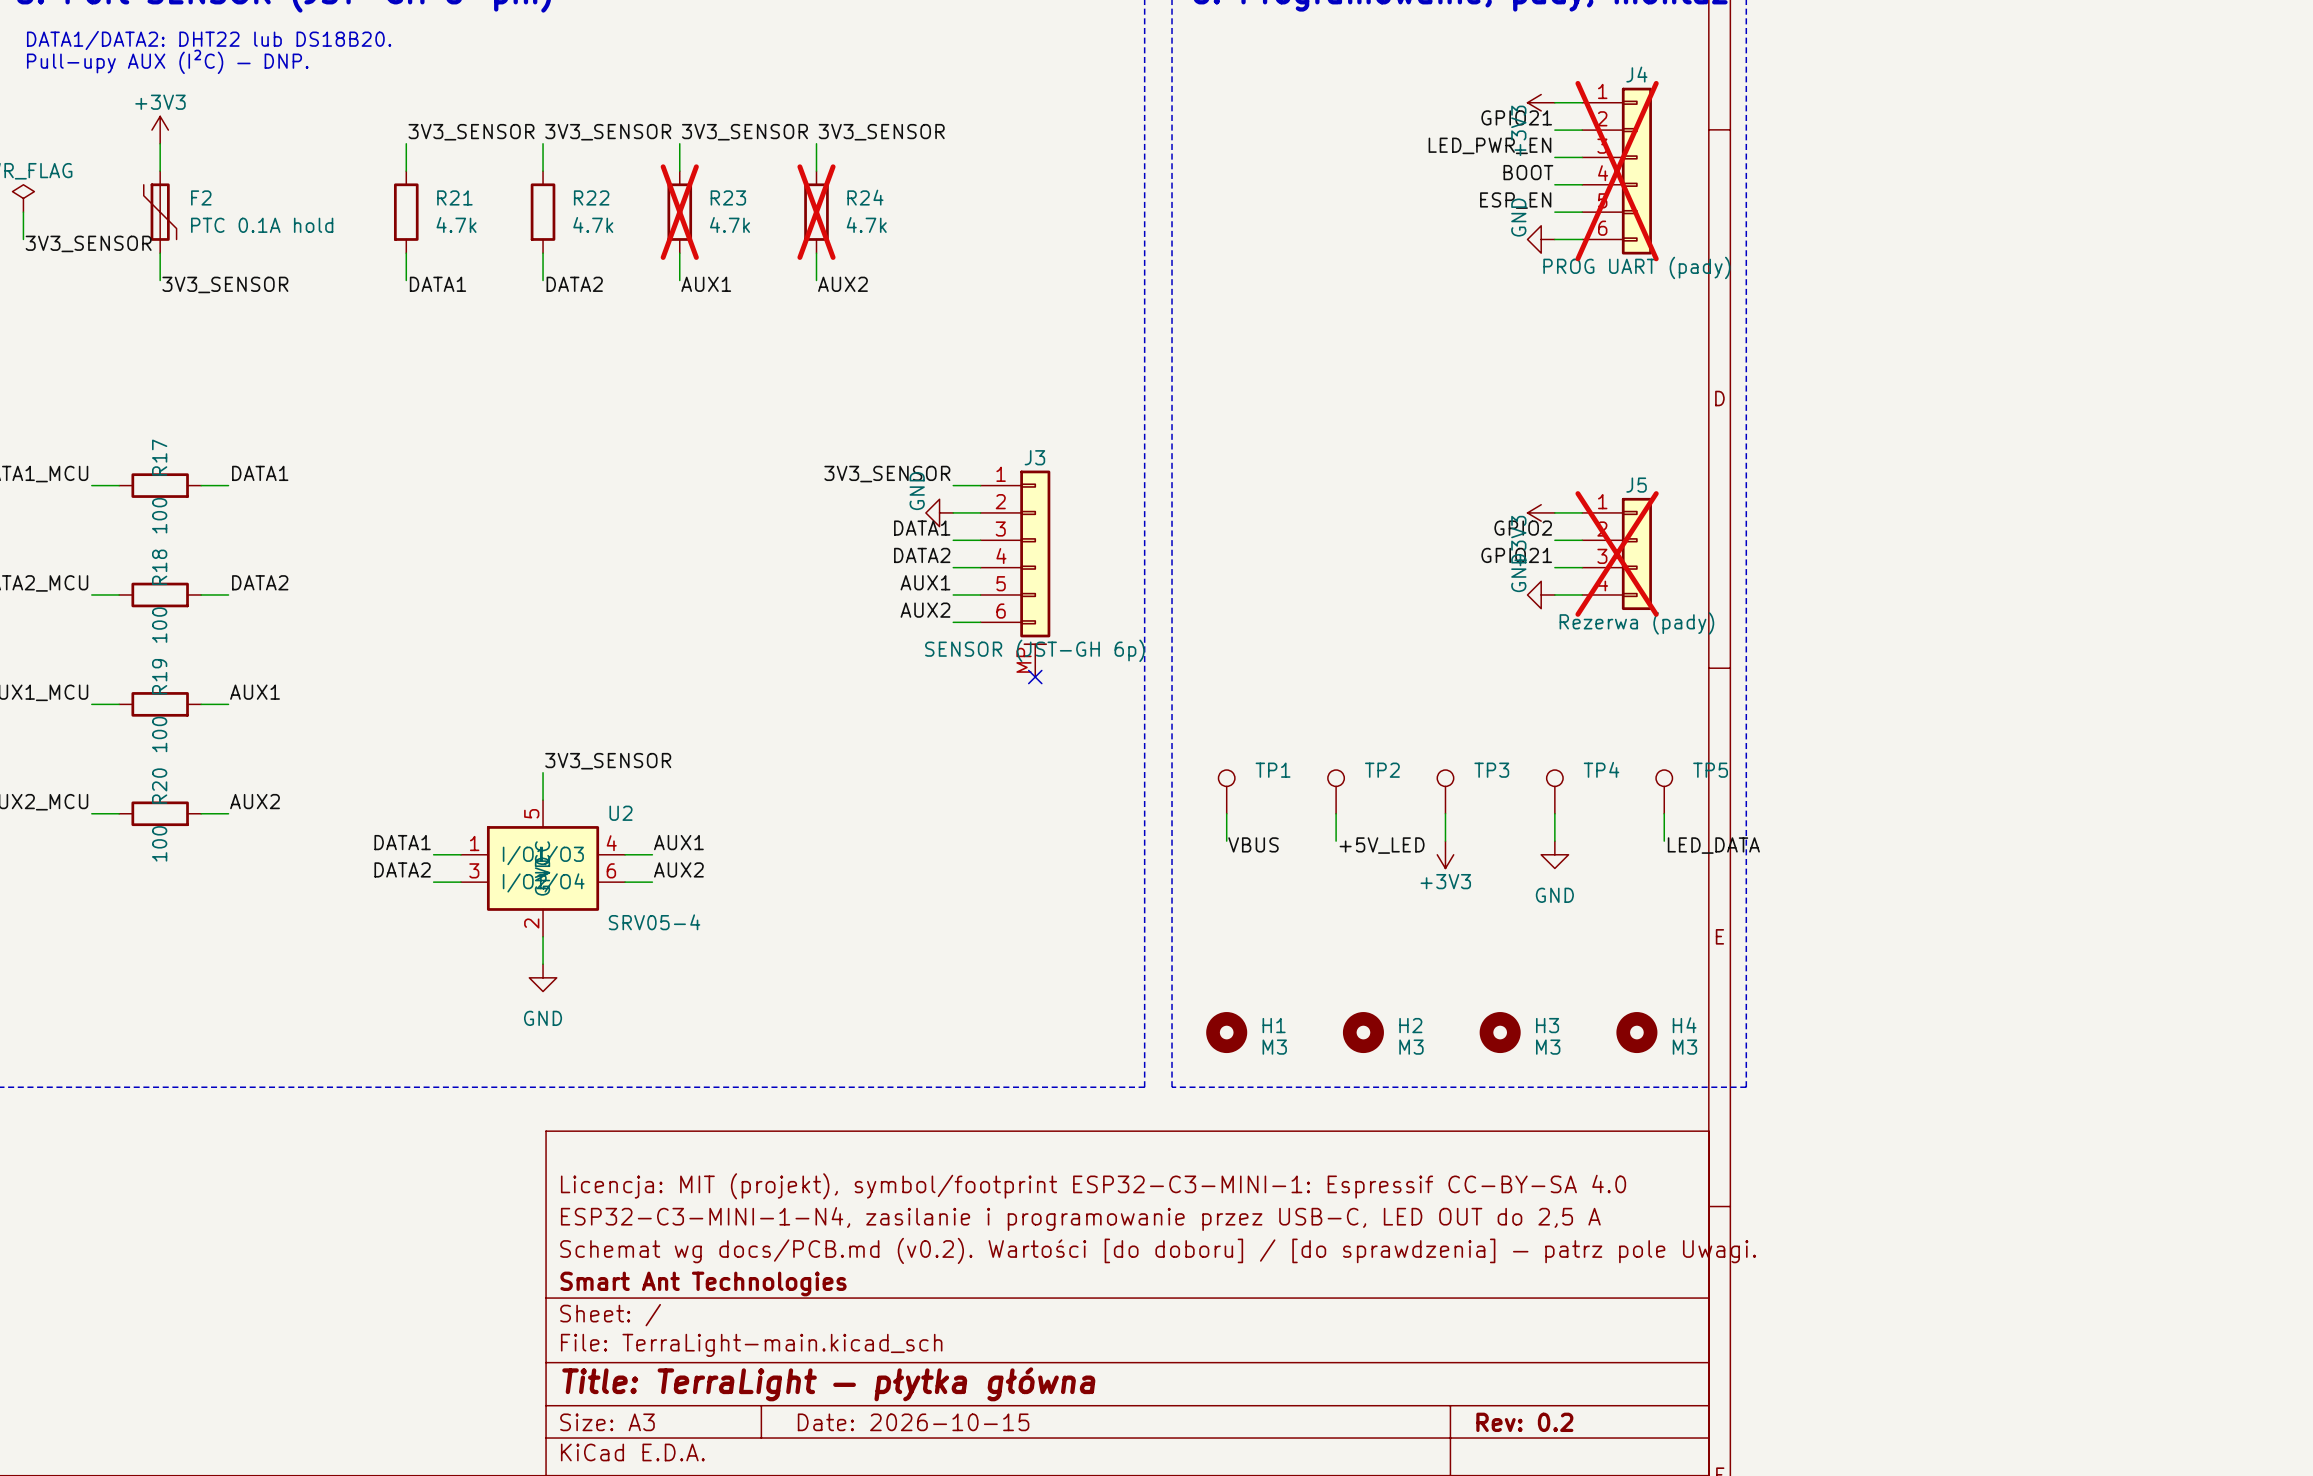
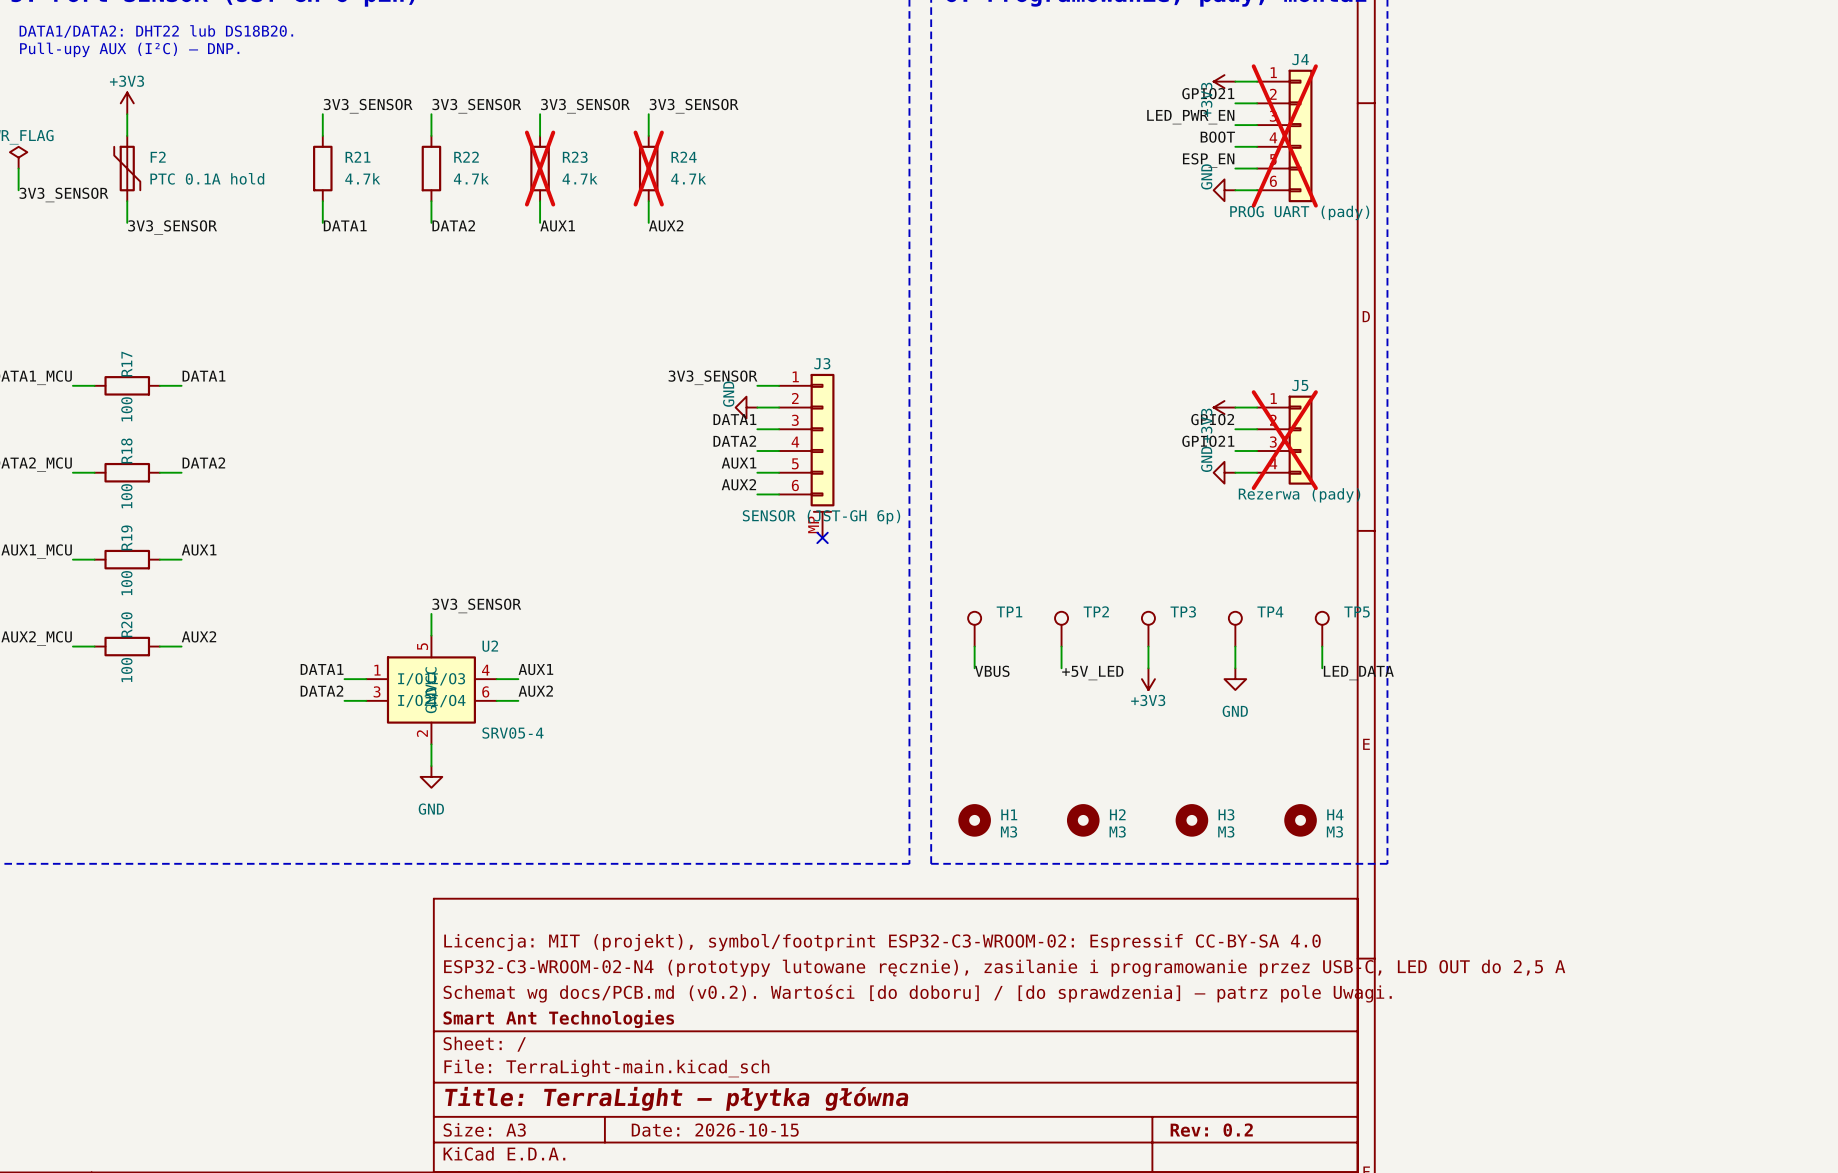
title block: Licencja: MIT (projekt), symbol/footprint ESP32-C3-MINI-1: Espressif CC-BY-SA 4.0 (1093, 1186) -> Licencja: MIT (projekt), symbol/footprint ESP32-C3-WROOM-02: Espressif CC-BY-SA 4.0 (882, 942)
title block: ESP32-C3-MINI-1-N4, zasilanie i programowanie przez USB-C, LED OUT do 2,5 A (1080, 1219) -> ESP32-C3-WROOM-02-N4 (prototypy lutowane ręcznie), zasilanie i programowanie przez USB-C, LED OUT do 2,5 A (1004, 968)

